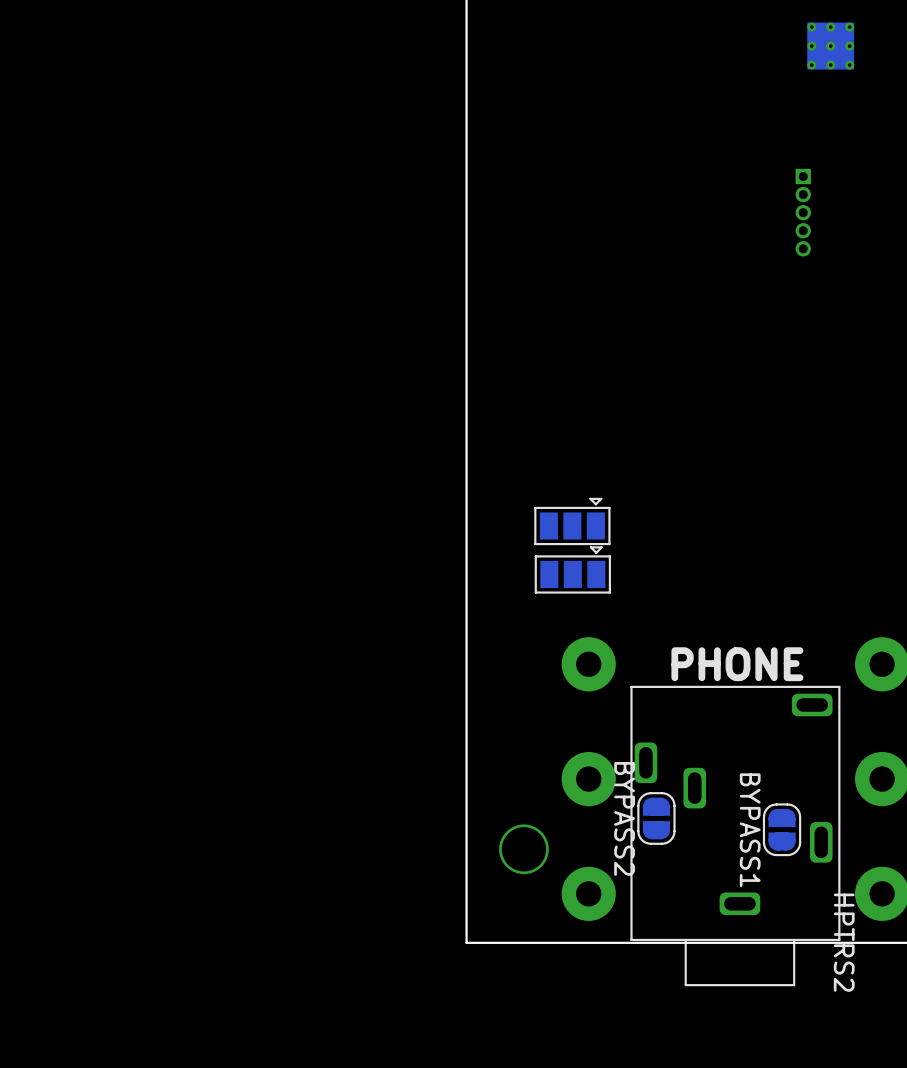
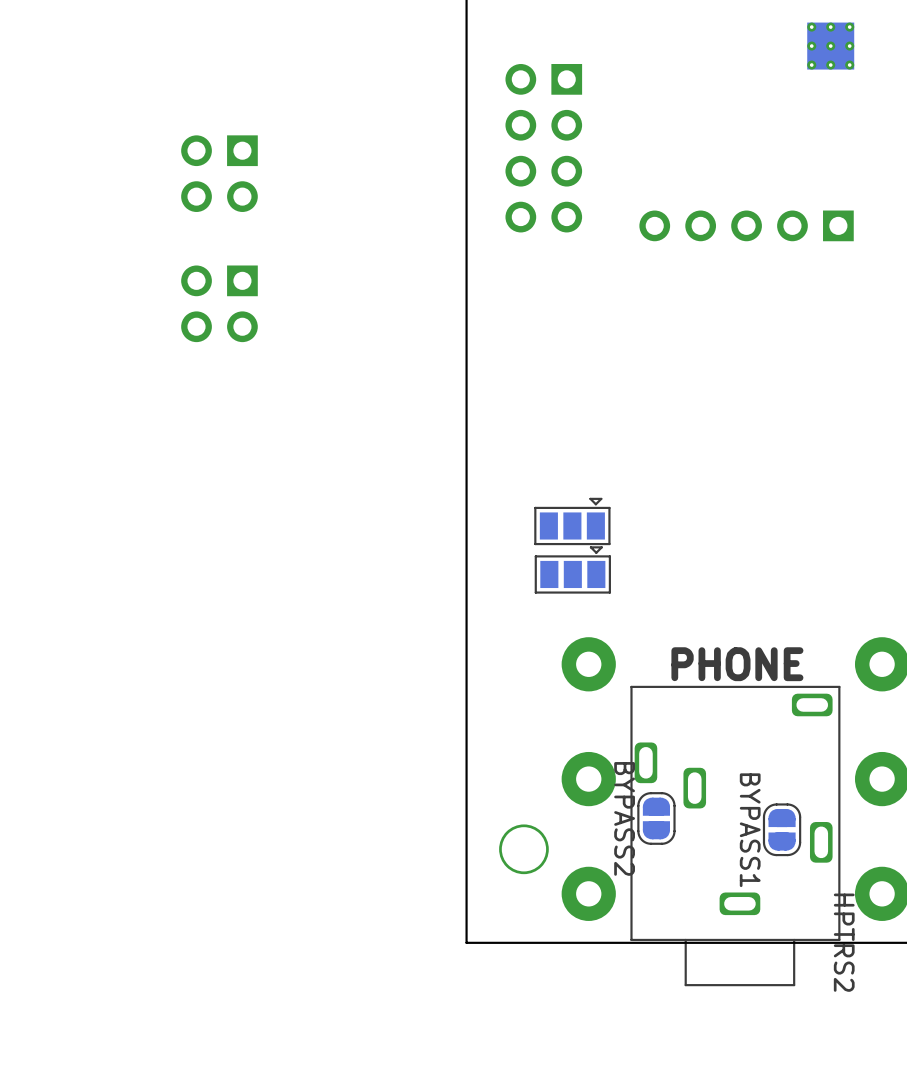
part: none -> (543, 148)
part: none -> (219, 173)
part: (803, 212) -> none
part: none -> (746, 225)
part: none -> (219, 303)

